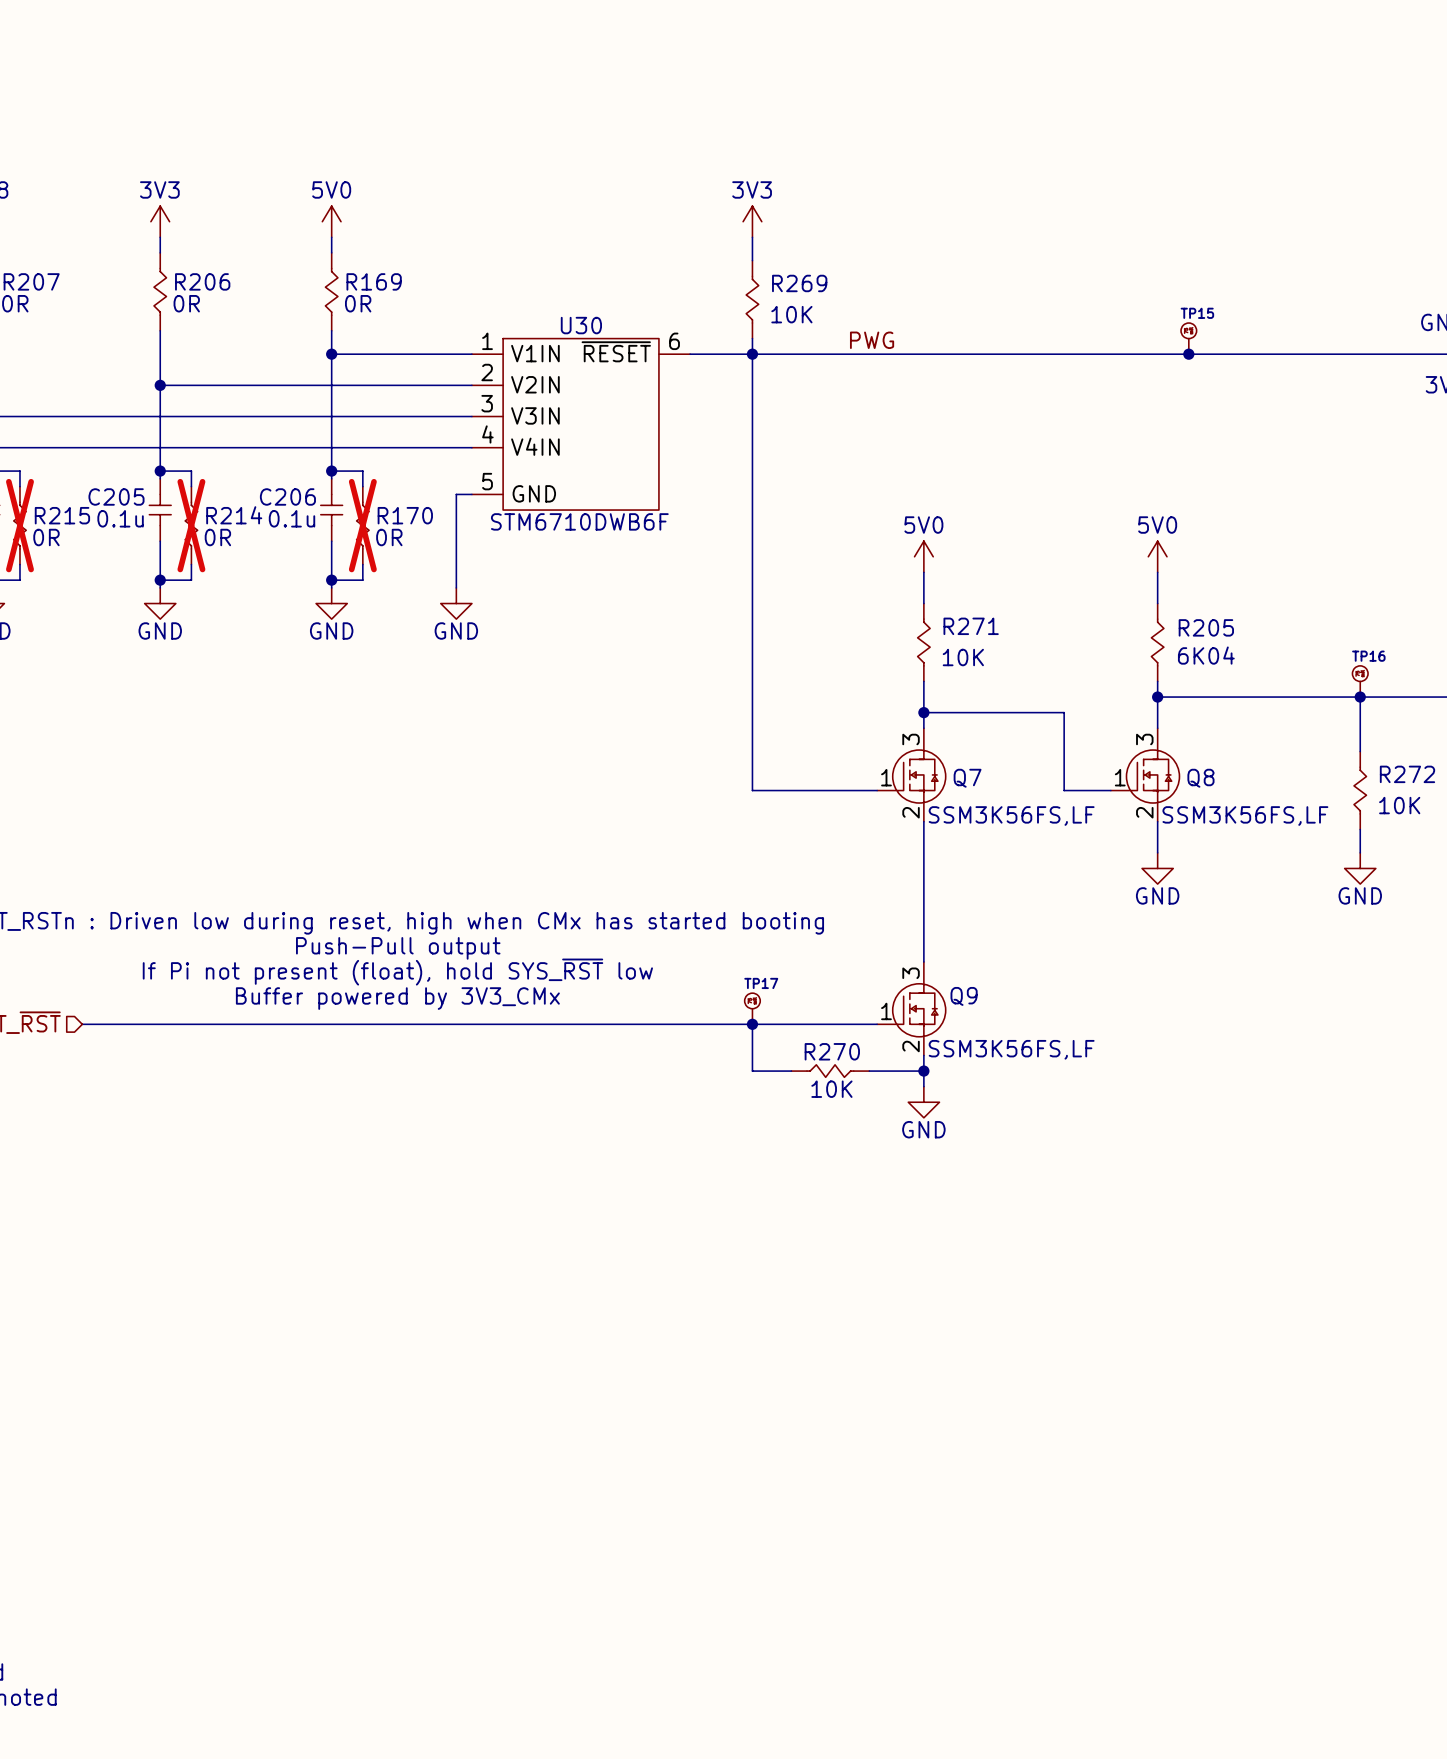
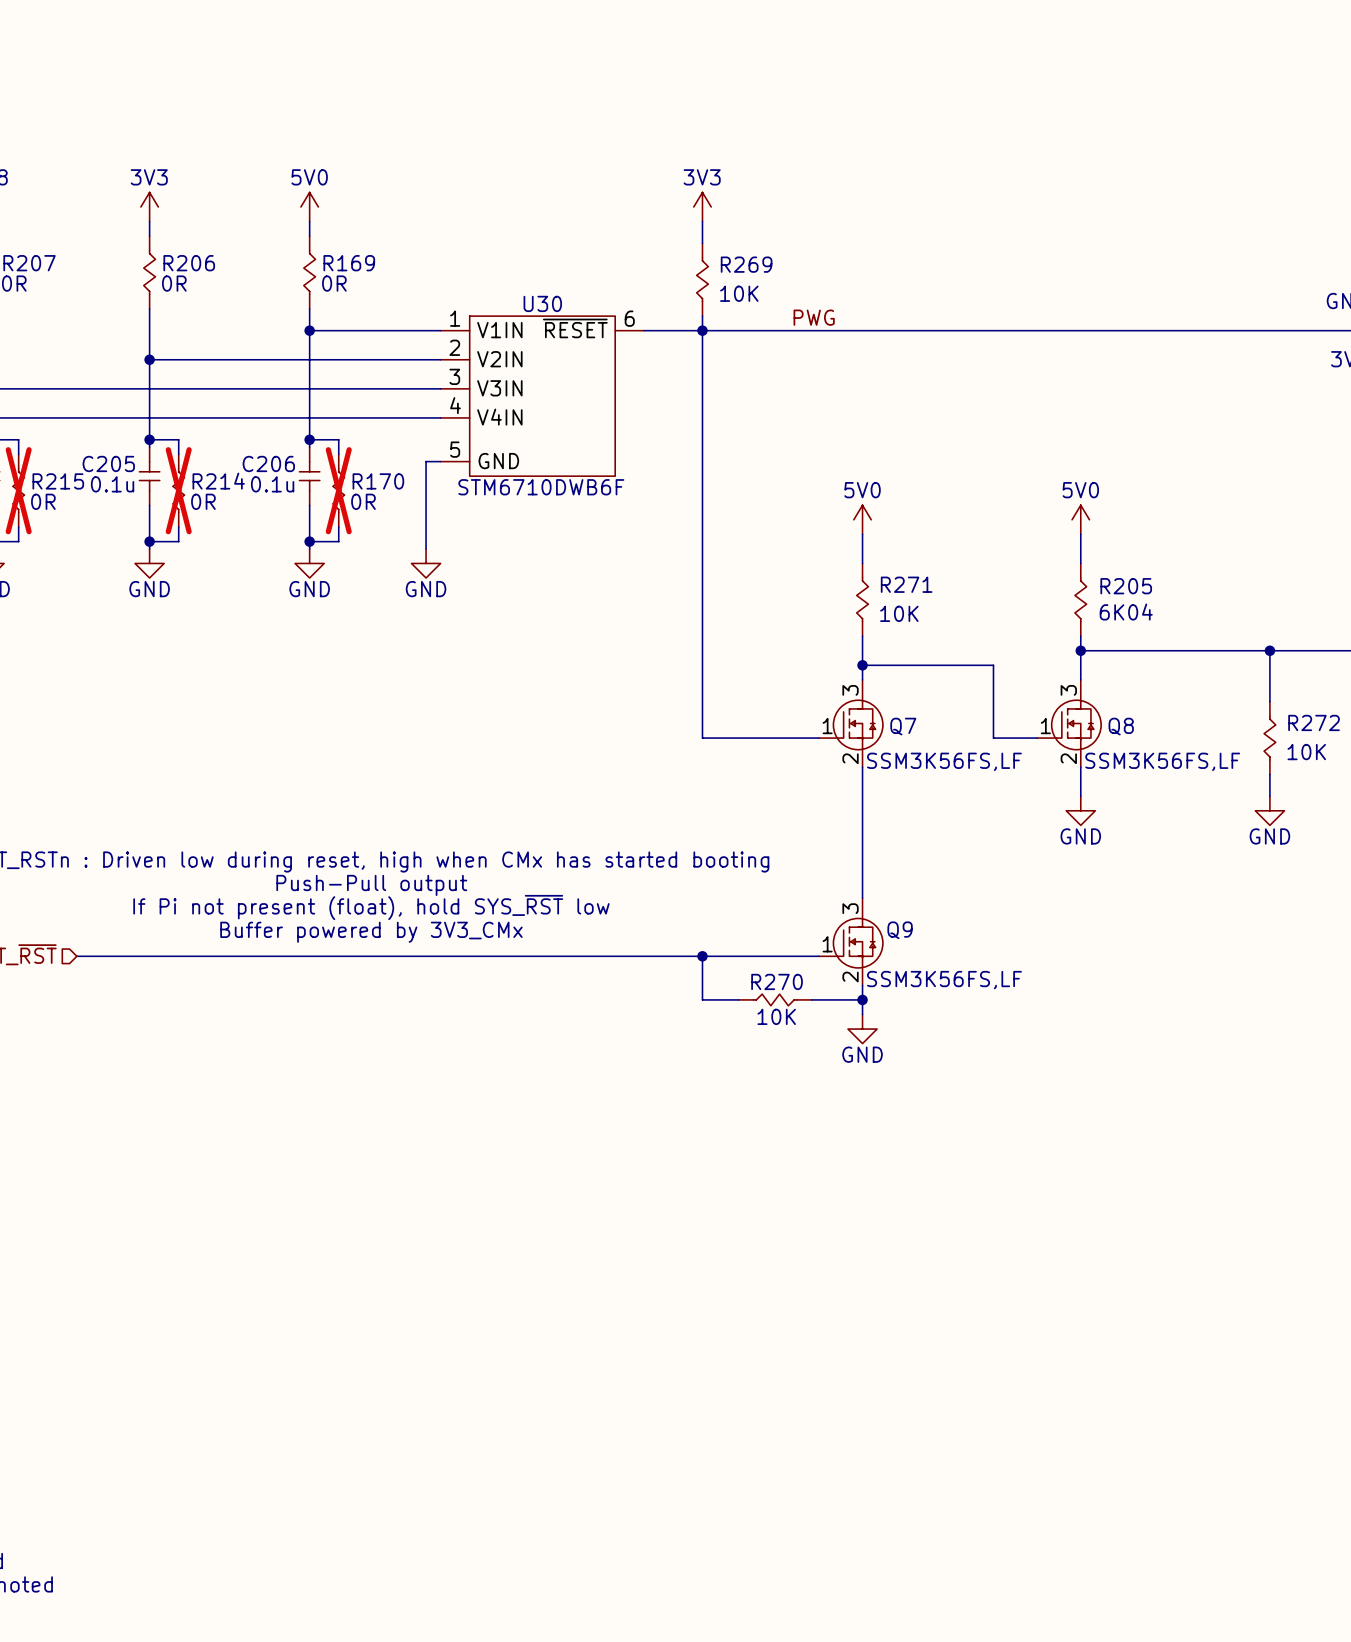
TP15: (1188, 338) -> none
junction: (1188, 354) -> none
TP16: (1360, 681) -> none
TP17: (752, 1008) -> none

